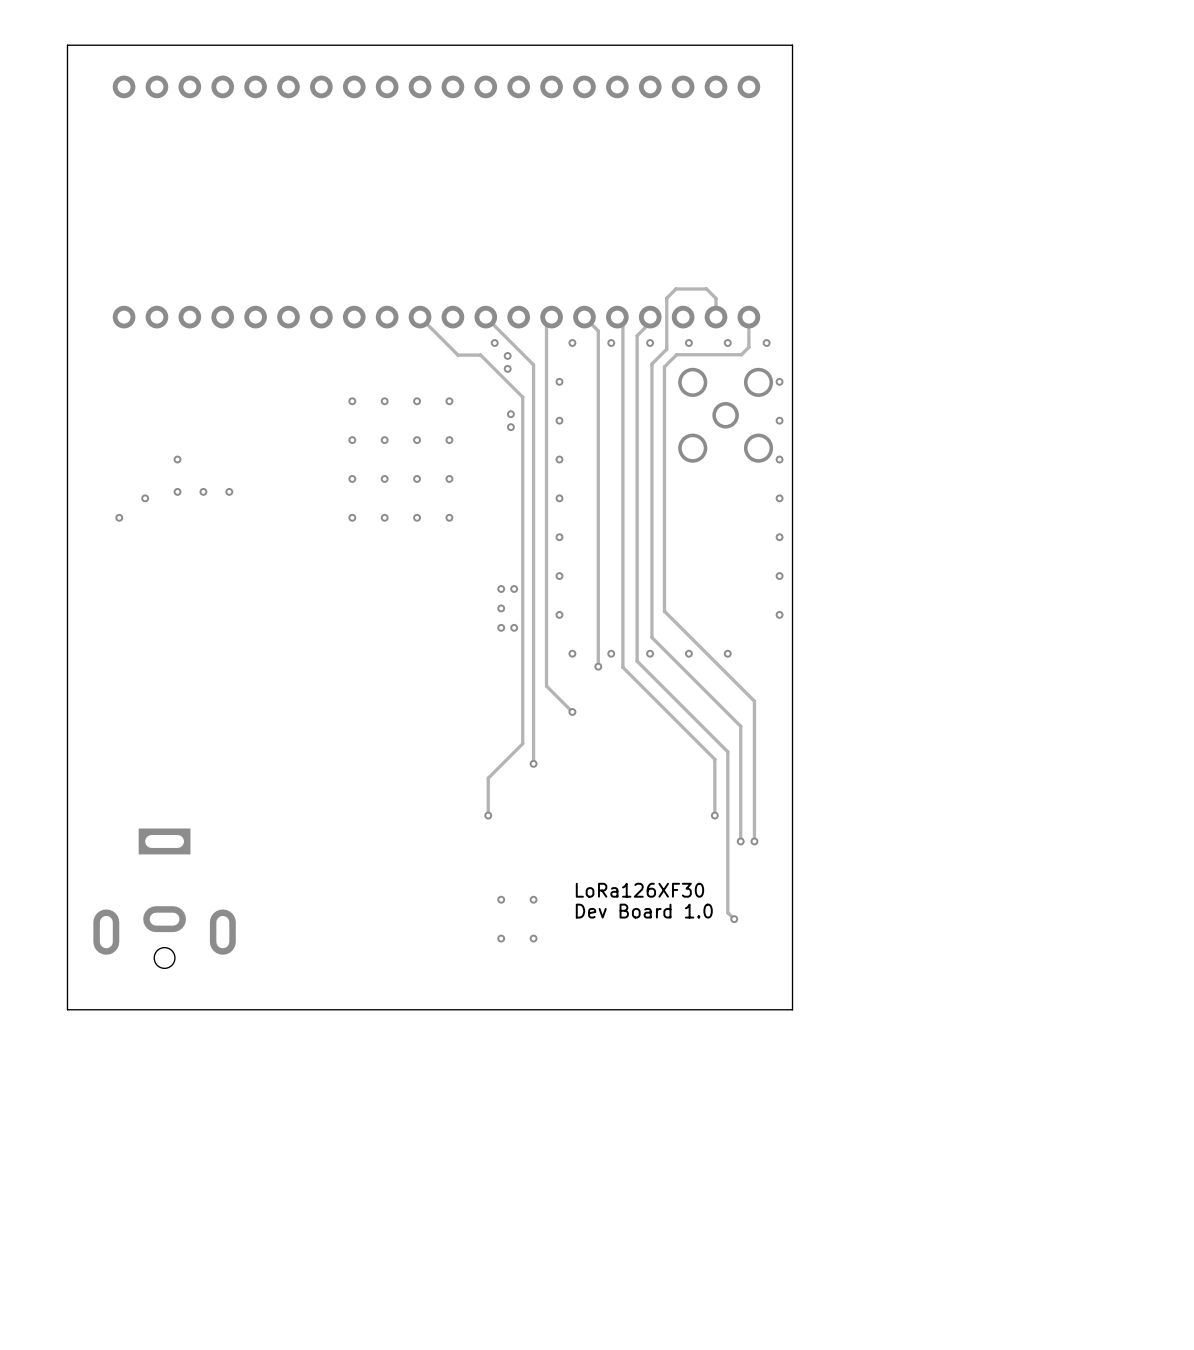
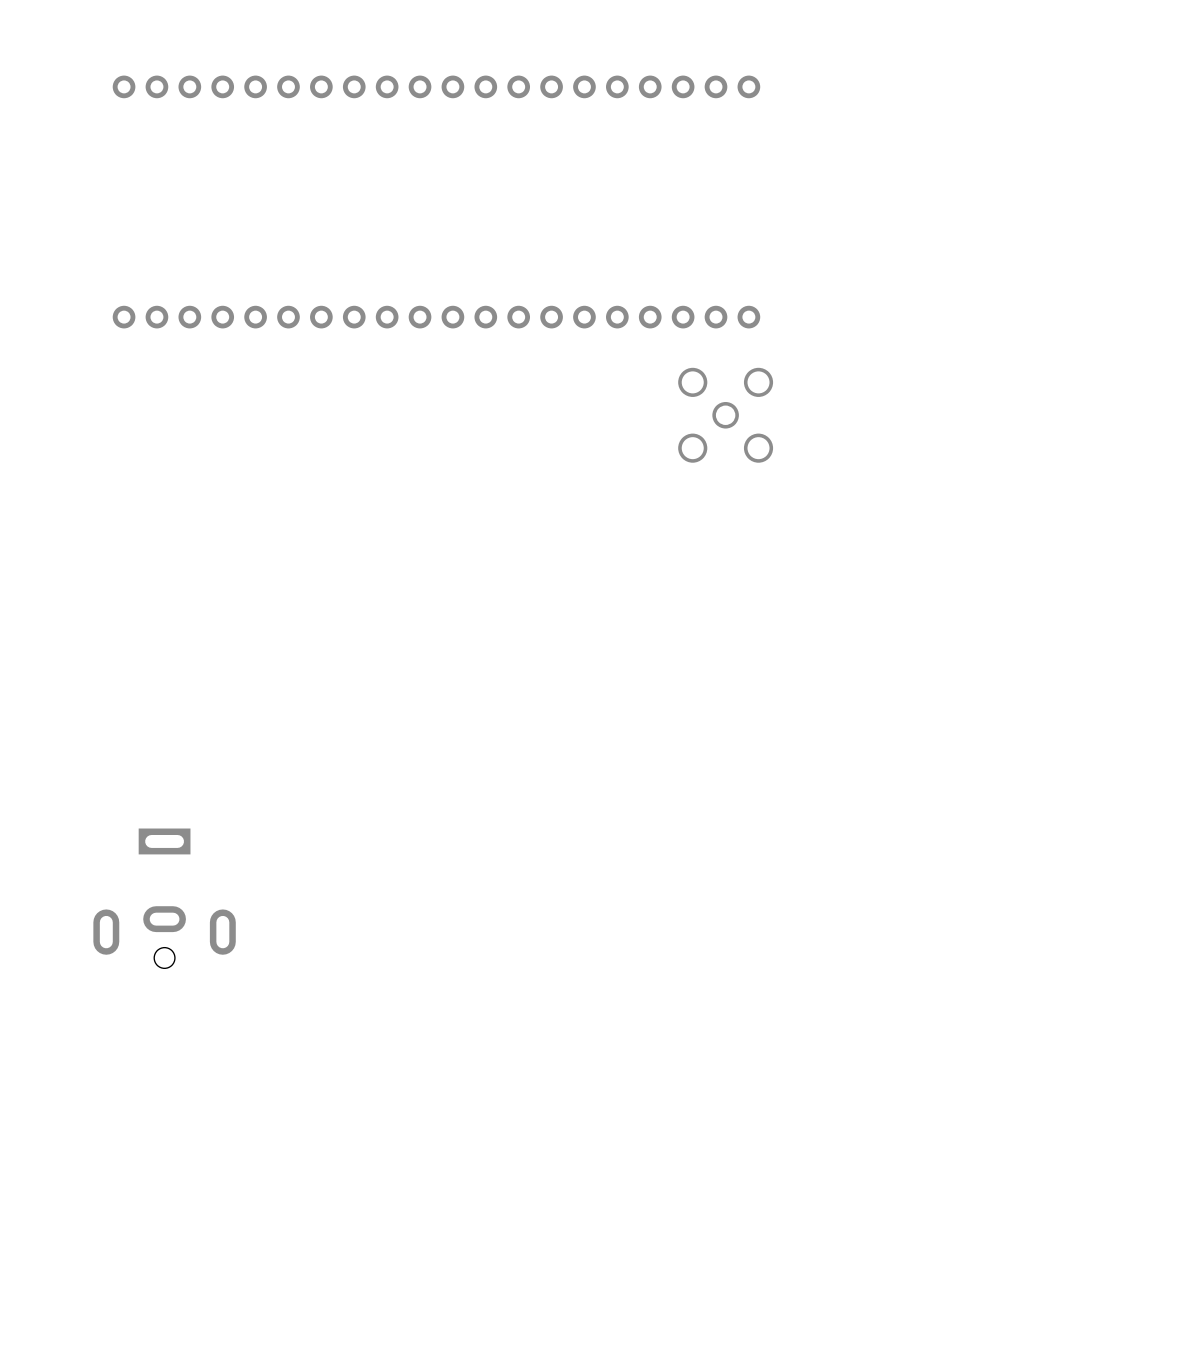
board edge: (792, 45) (792, 1009) (67, 1009) (67, 45) (792, 45) -> none
track: (420, 317) (458, 355) (480, 355) (522, 397) (522, 743) (488, 778) (488, 815) -> none
track: (485, 317) (533, 364) (533, 763) -> none
track: (551, 317) (546, 322) (546, 686) (572, 711) -> none
track: (584, 317) (598, 330) (598, 666) -> none
track: (622, 317) (622, 667) (714, 759) (714, 815) -> none
track: (655, 317) (637, 335) (637, 661) (727, 751) (727, 912) (734, 919) -> none
track: (721, 317) (715, 317) (715, 298) (706, 288) (675, 288) (666, 298) (666, 349) (651, 363) (651, 637) (740, 726) (740, 841) -> none
track: (748, 317) (748, 347) (741, 354) (676, 354) (664, 366) (664, 611) (754, 701) (754, 841) -> none
via: (494, 343) -> none
via: (572, 343) -> none
via: (611, 343) -> none
via: (650, 343) -> none
via: (688, 343) -> none
via: (727, 343) -> none
via: (766, 343) -> none
via: (507, 355) -> none
via: (507, 368) -> none
via: (559, 381) -> none
via: (779, 381) -> none
via: (352, 401) -> none
via: (384, 401) -> none
via: (417, 401) -> none
via: (449, 401) -> none
via: (510, 414) -> none
via: (559, 420) -> none
via: (779, 420) -> none
via: (510, 427) -> none
via: (352, 440) -> none
via: (384, 440) -> none
via: (417, 440) -> none
via: (449, 440) -> none
via: (177, 459) -> none
via: (559, 459) -> none
via: (779, 459) -> none
via: (352, 478) -> none
via: (384, 478) -> none
via: (417, 478) -> none
via: (449, 478) -> none
via: (177, 491) -> none
via: (203, 491) -> none
via: (229, 491) -> none
via: (145, 498) -> none
via: (559, 498) -> none
via: (779, 498) -> none
via: (119, 517) -> none
via: (352, 517) -> none
via: (384, 517) -> none
via: (417, 517) -> none
via: (449, 517) -> none
via: (559, 537) -> none
via: (779, 537) -> none
via: (559, 576) -> none
via: (779, 576) -> none
via: (501, 588) -> none
via: (514, 588) -> none
via: (501, 608) -> none
via: (559, 614) -> none
via: (779, 614) -> none
via: (501, 627) -> none
via: (514, 627) -> none
via: (572, 653) -> none
via: (611, 653) -> none
via: (650, 653) -> none
via: (688, 653) -> none
via: (727, 653) -> none
via: (598, 666) -> none
via: (572, 711) -> none
via: (533, 763) -> none
via: (488, 815) -> none
via: (714, 815) -> none
via: (740, 841) -> none
via: (754, 841) -> none
text: LoRa126XF30 (639, 890) -> none
via: (501, 899) -> none
via: (533, 899) -> none
text: Dev Board 1.0 (644, 911) -> none
via: (734, 919) -> none
via: (501, 938) -> none
via: (533, 938) -> none

